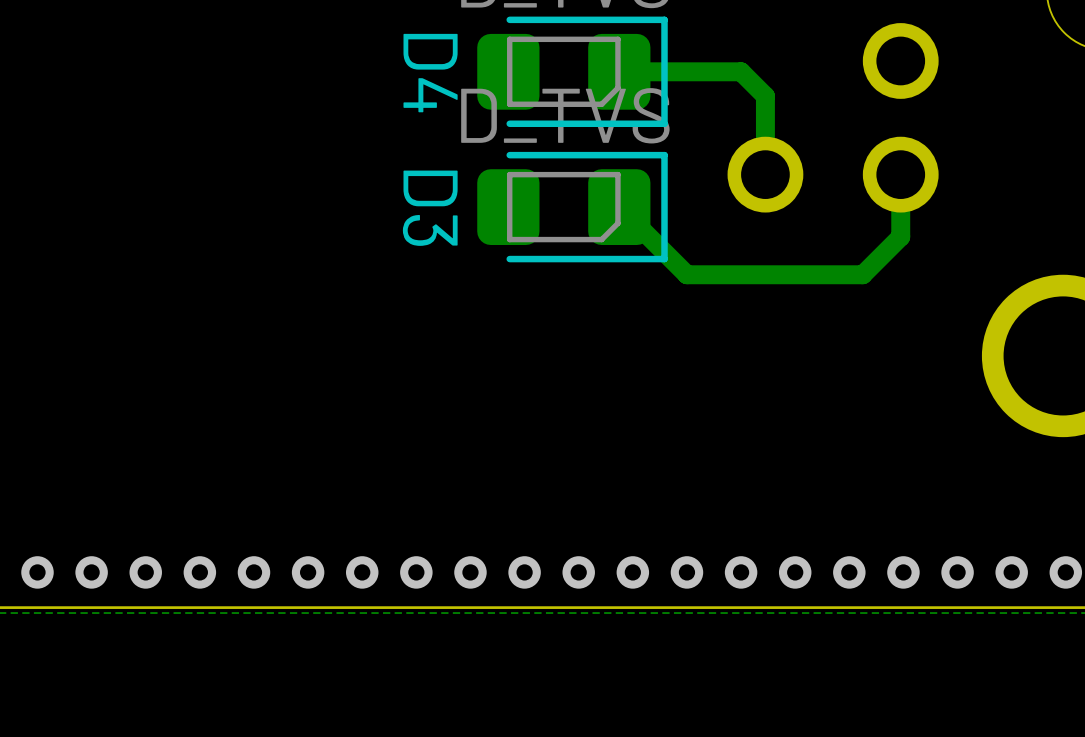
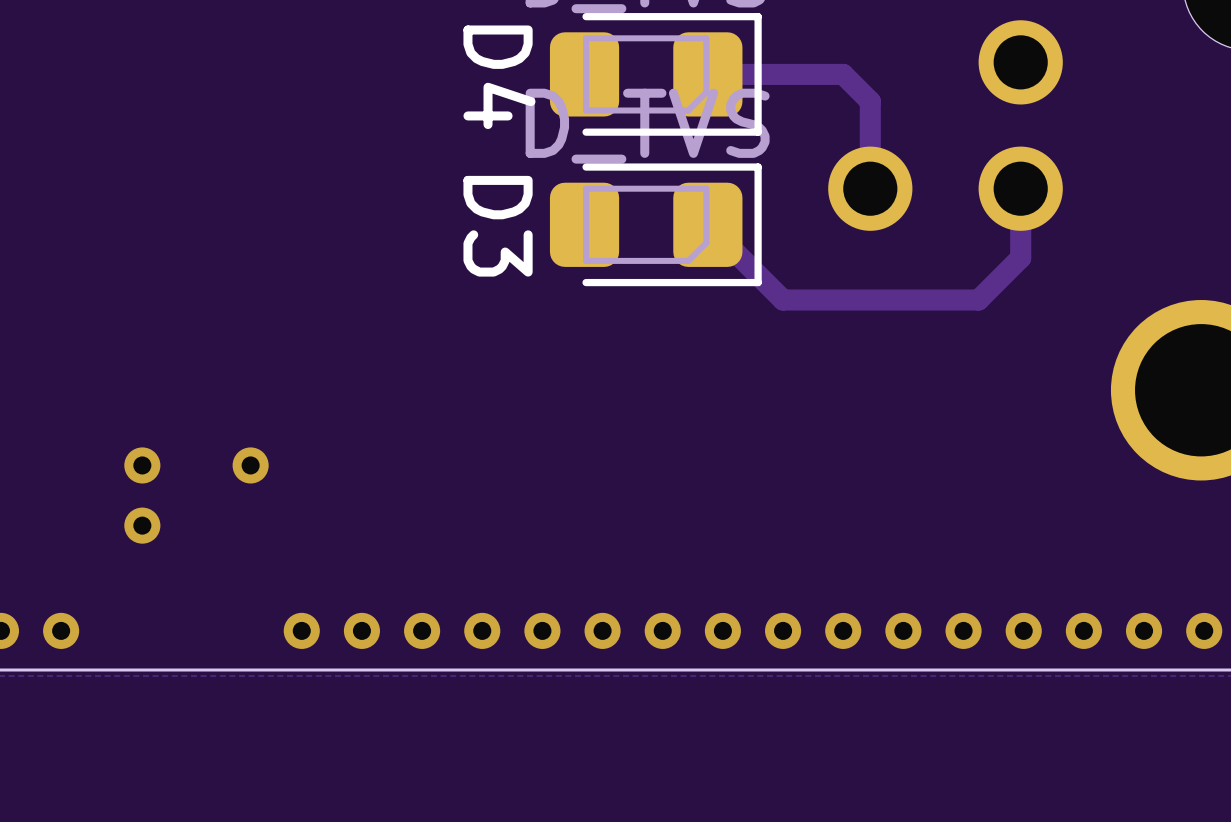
via: none -> (142, 465)
via: none -> (250, 465)
via: none -> (142, 525)
via: (91, 572) -> none
via: (145, 572) -> none
via: (199, 572) -> none

